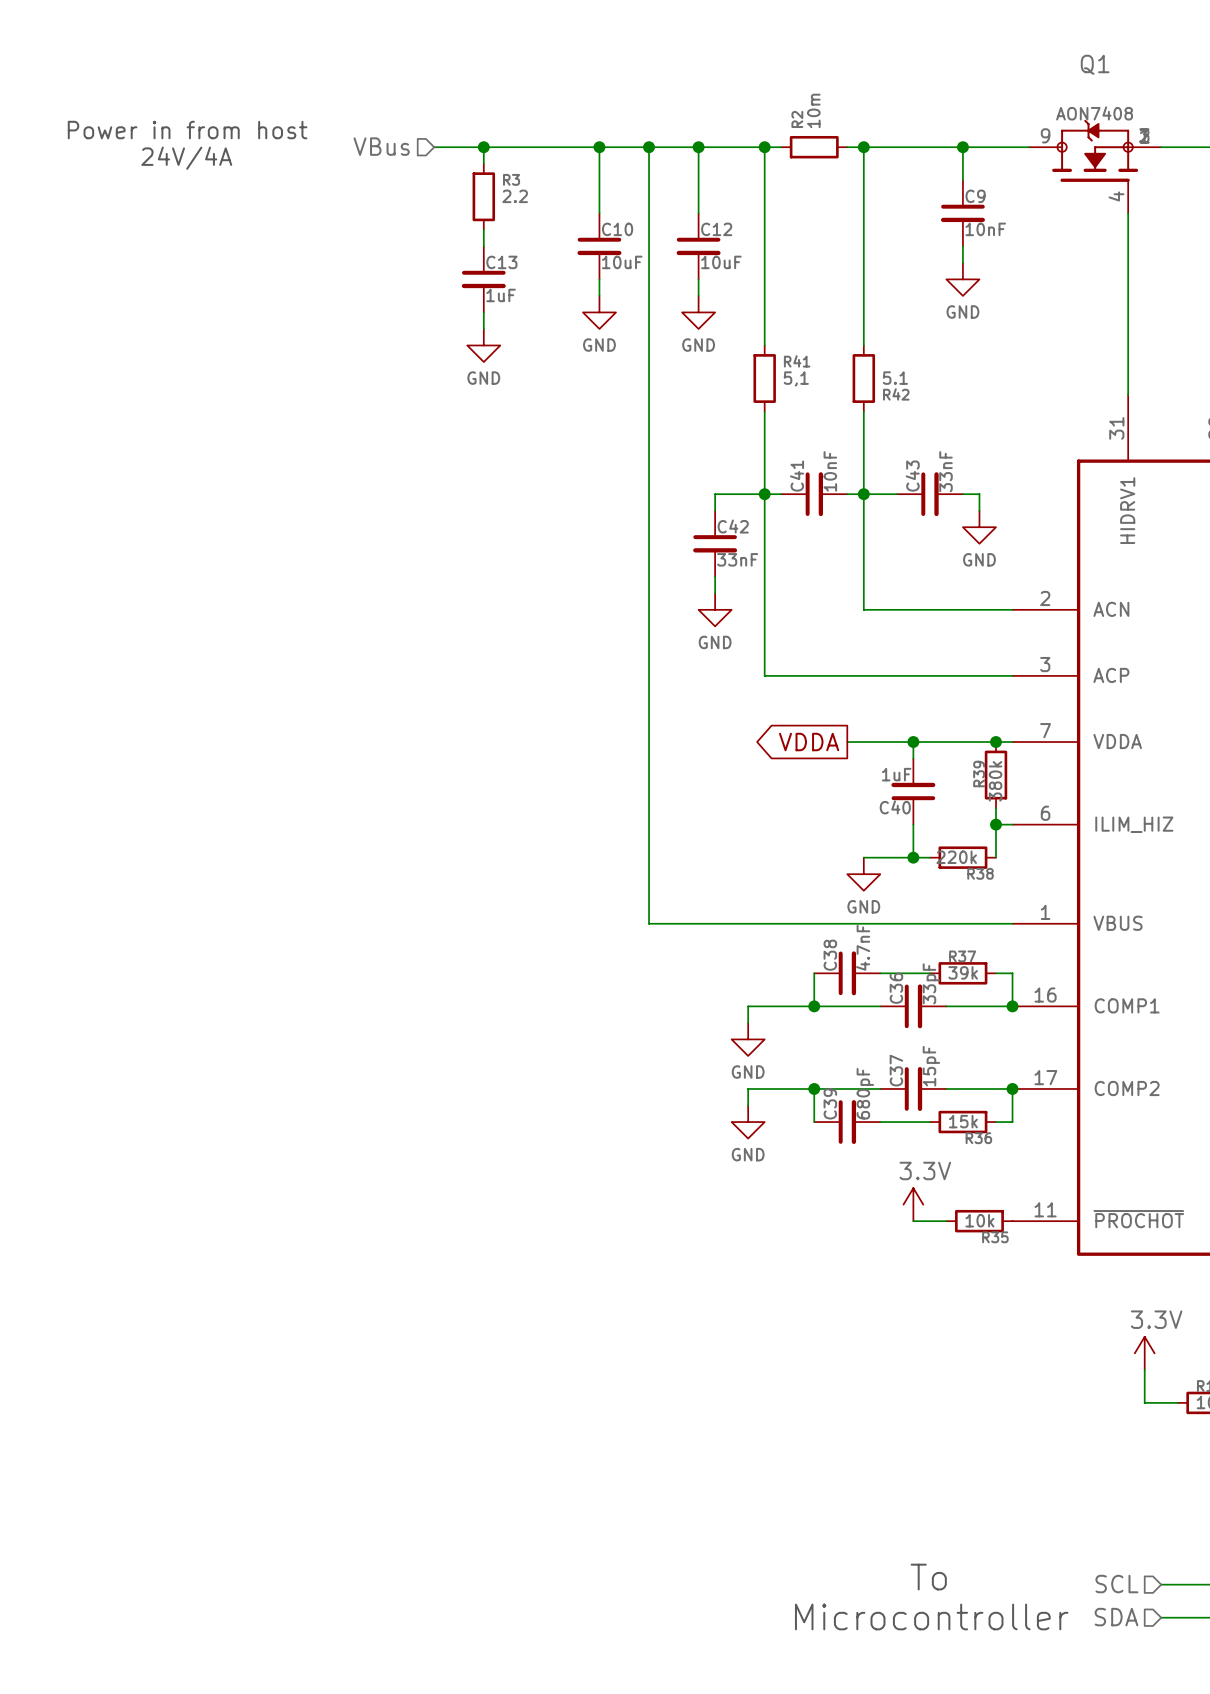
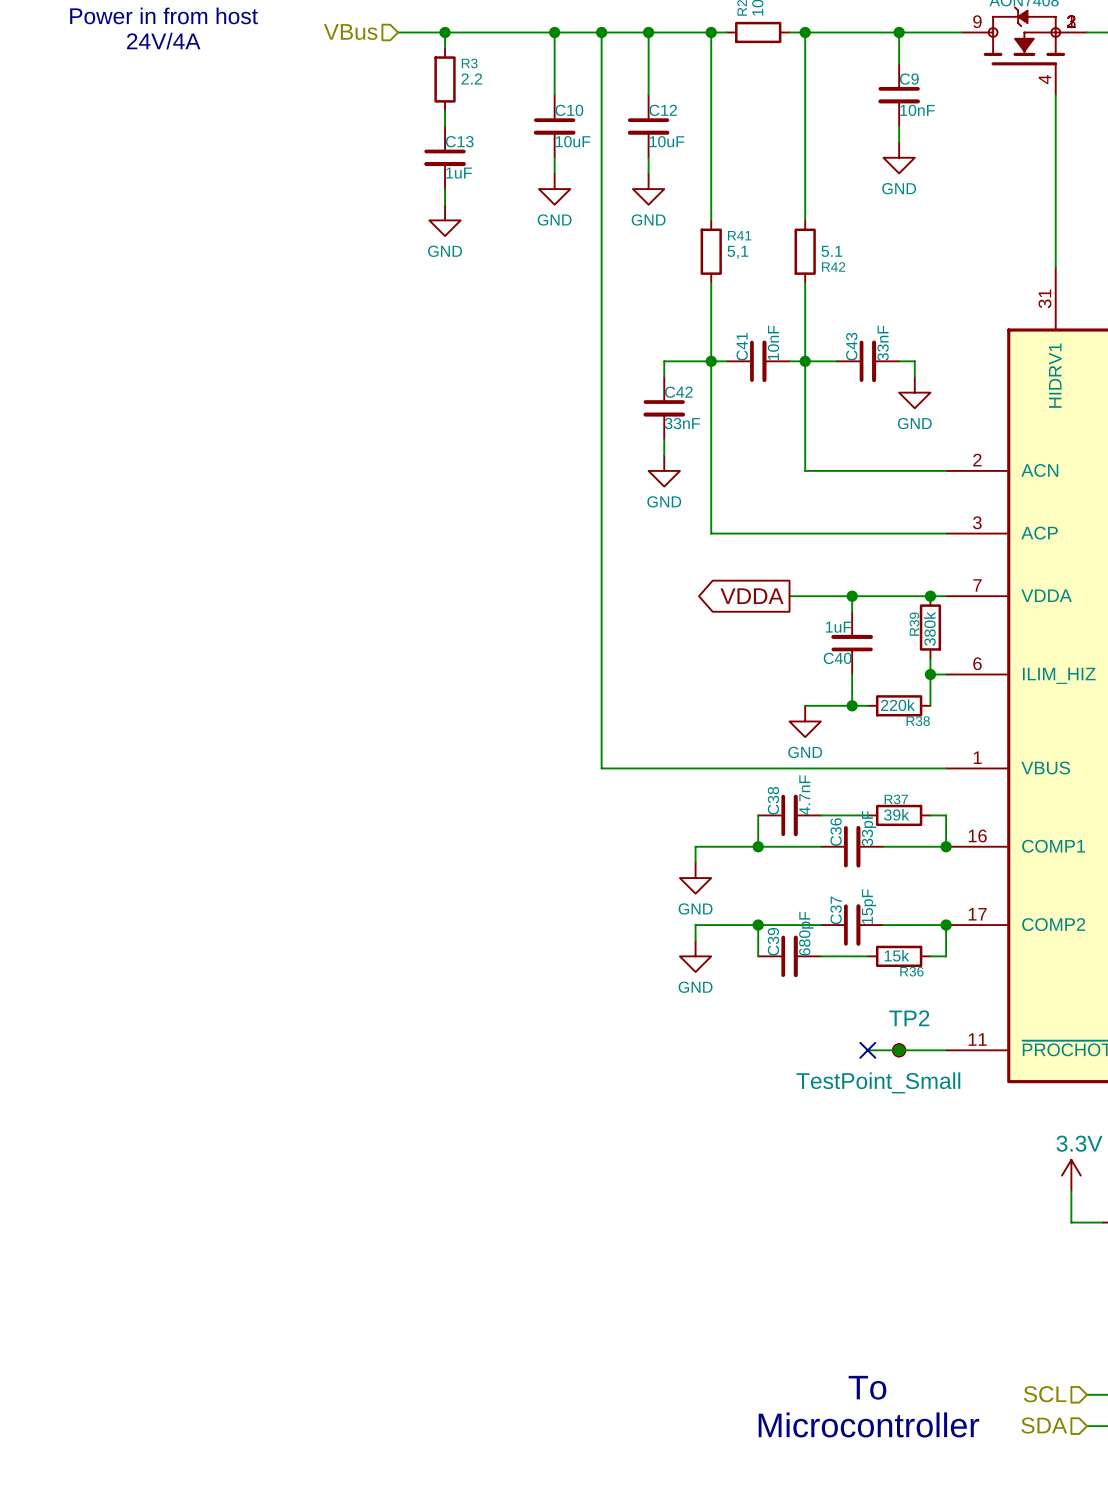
power symbol: 3.3V (913, 1204) -> none
wire: (913, 1221) (929, 1221) -> none
no-connect mark: none -> (867, 1050)
wire: none -> (883, 1050) (946, 1050)
TP2: none -> TestPoint_Small (899, 1050)
junction: none -> (899, 1050)
R35: 10k (979, 1221) -> none

